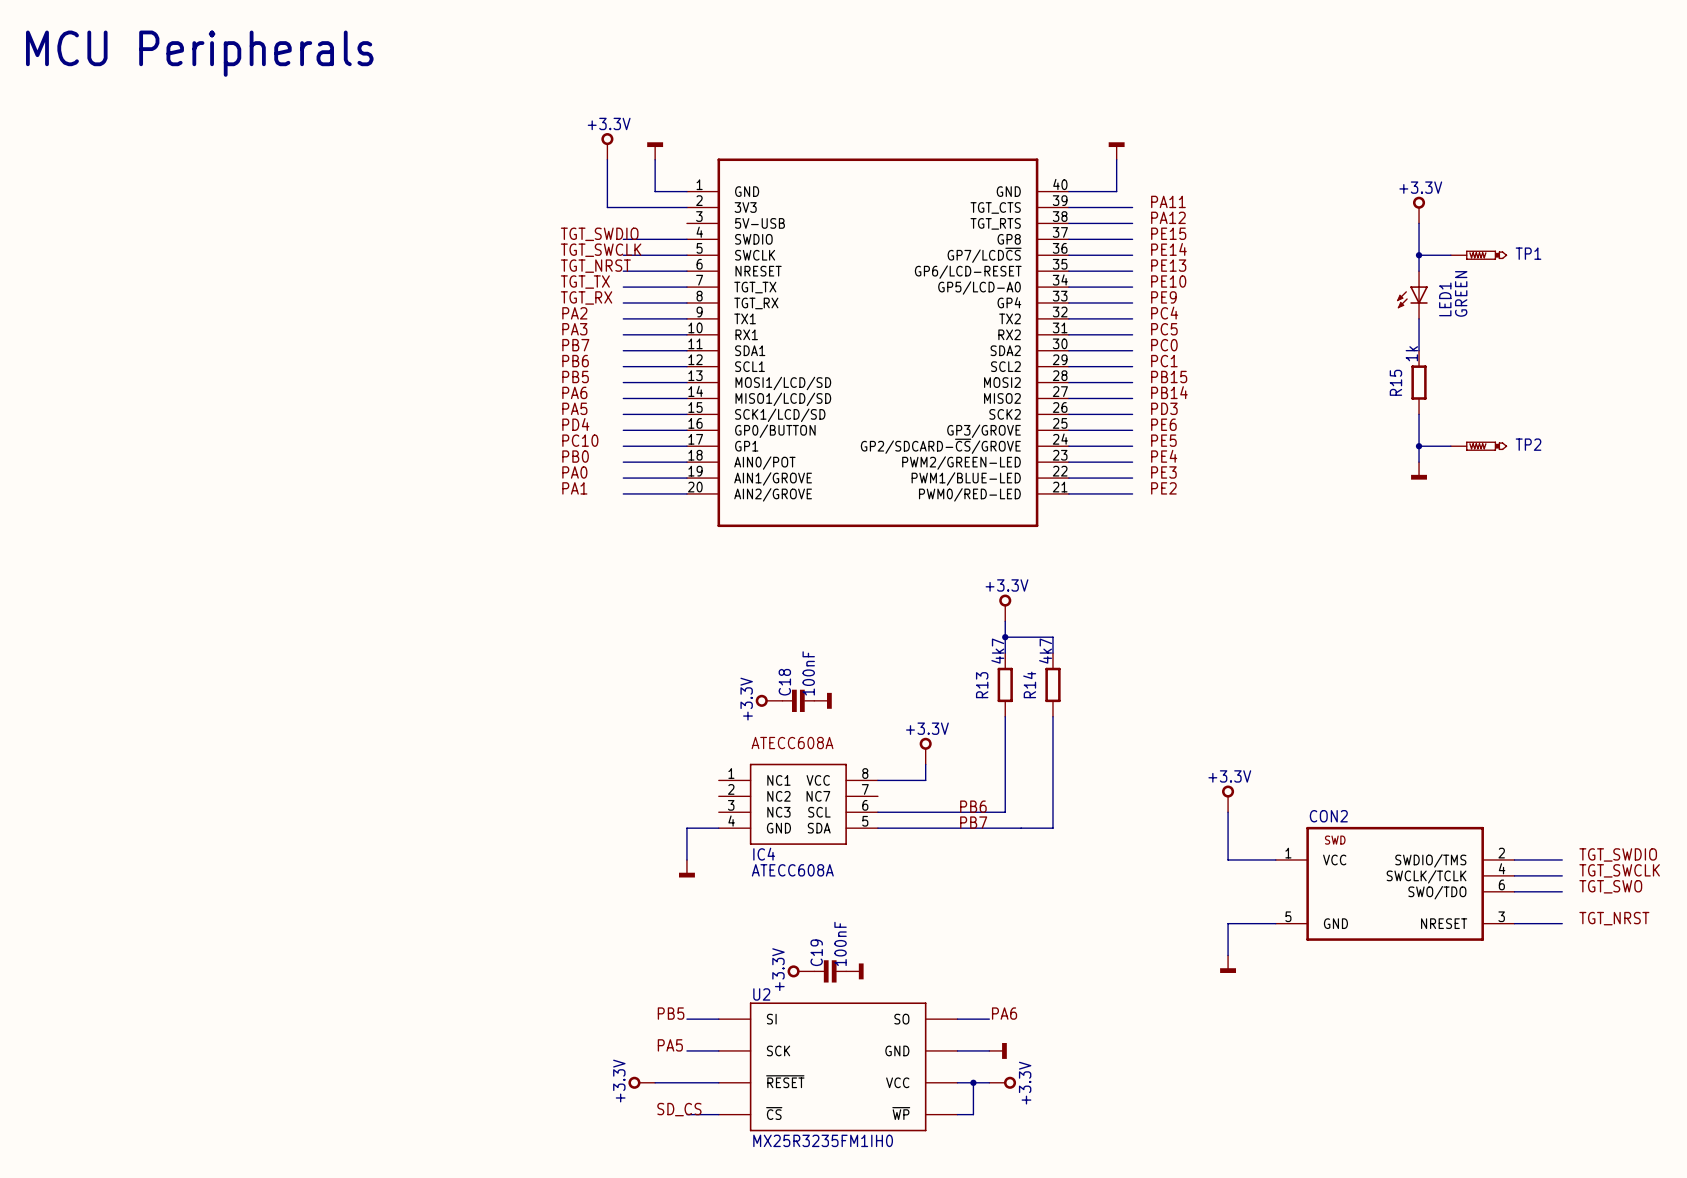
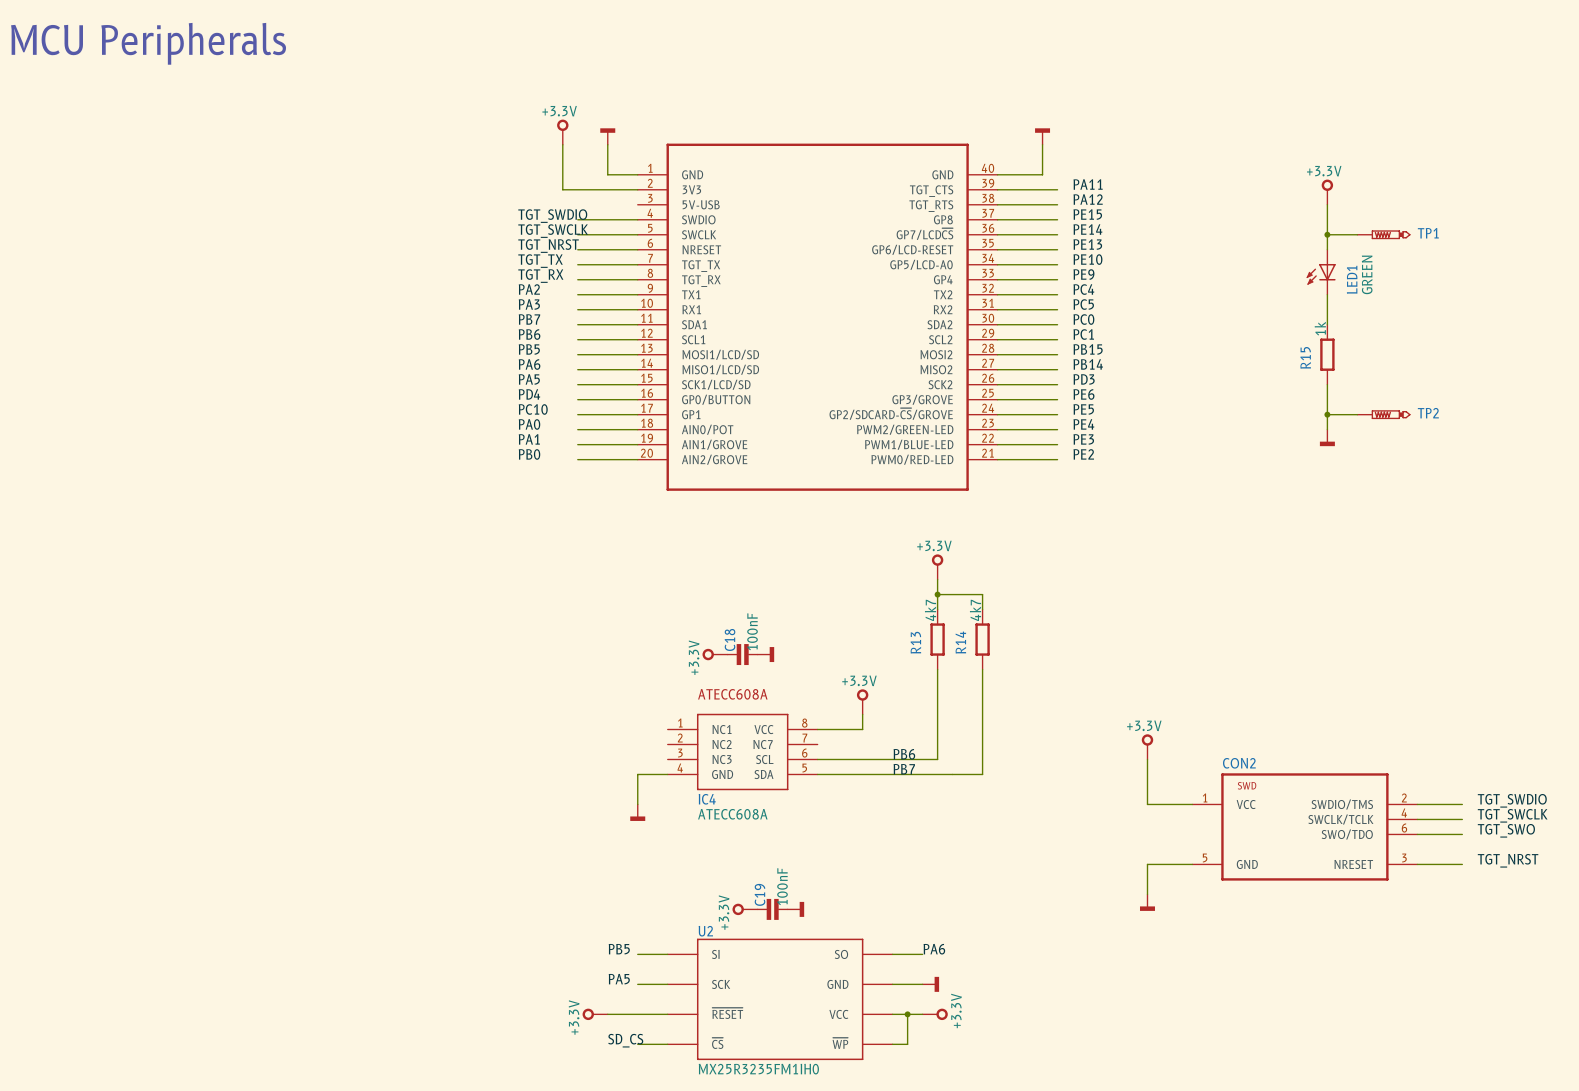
label: PB0 (575, 456) -> PA0 (529, 424)
label: PA0 (574, 472) -> PA1 (529, 439)
label: PA1 (574, 488) -> PB0 (529, 454)

